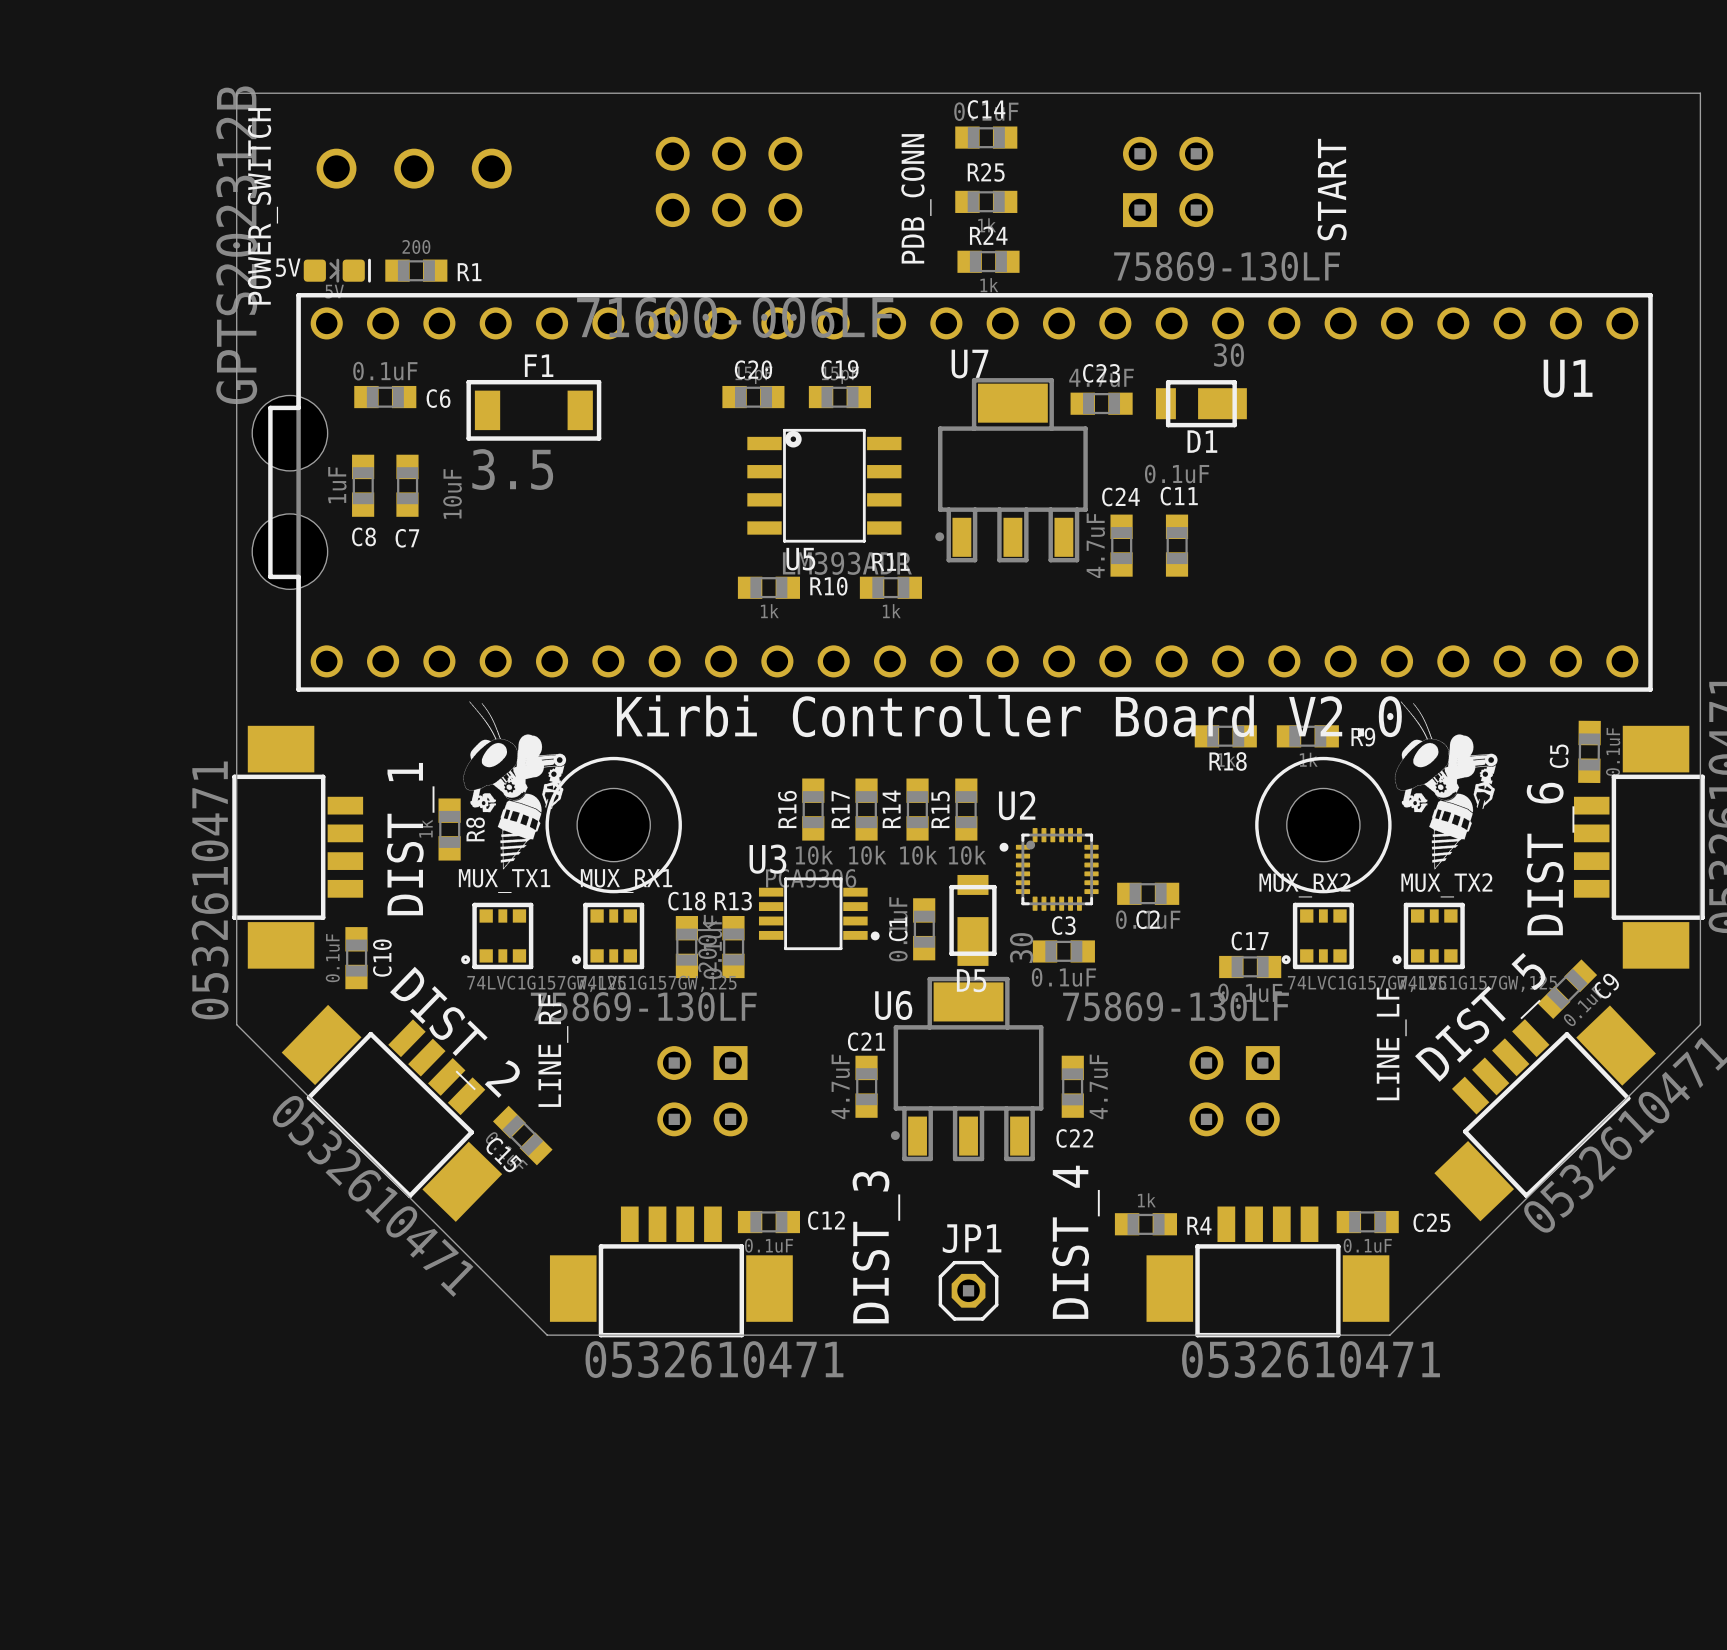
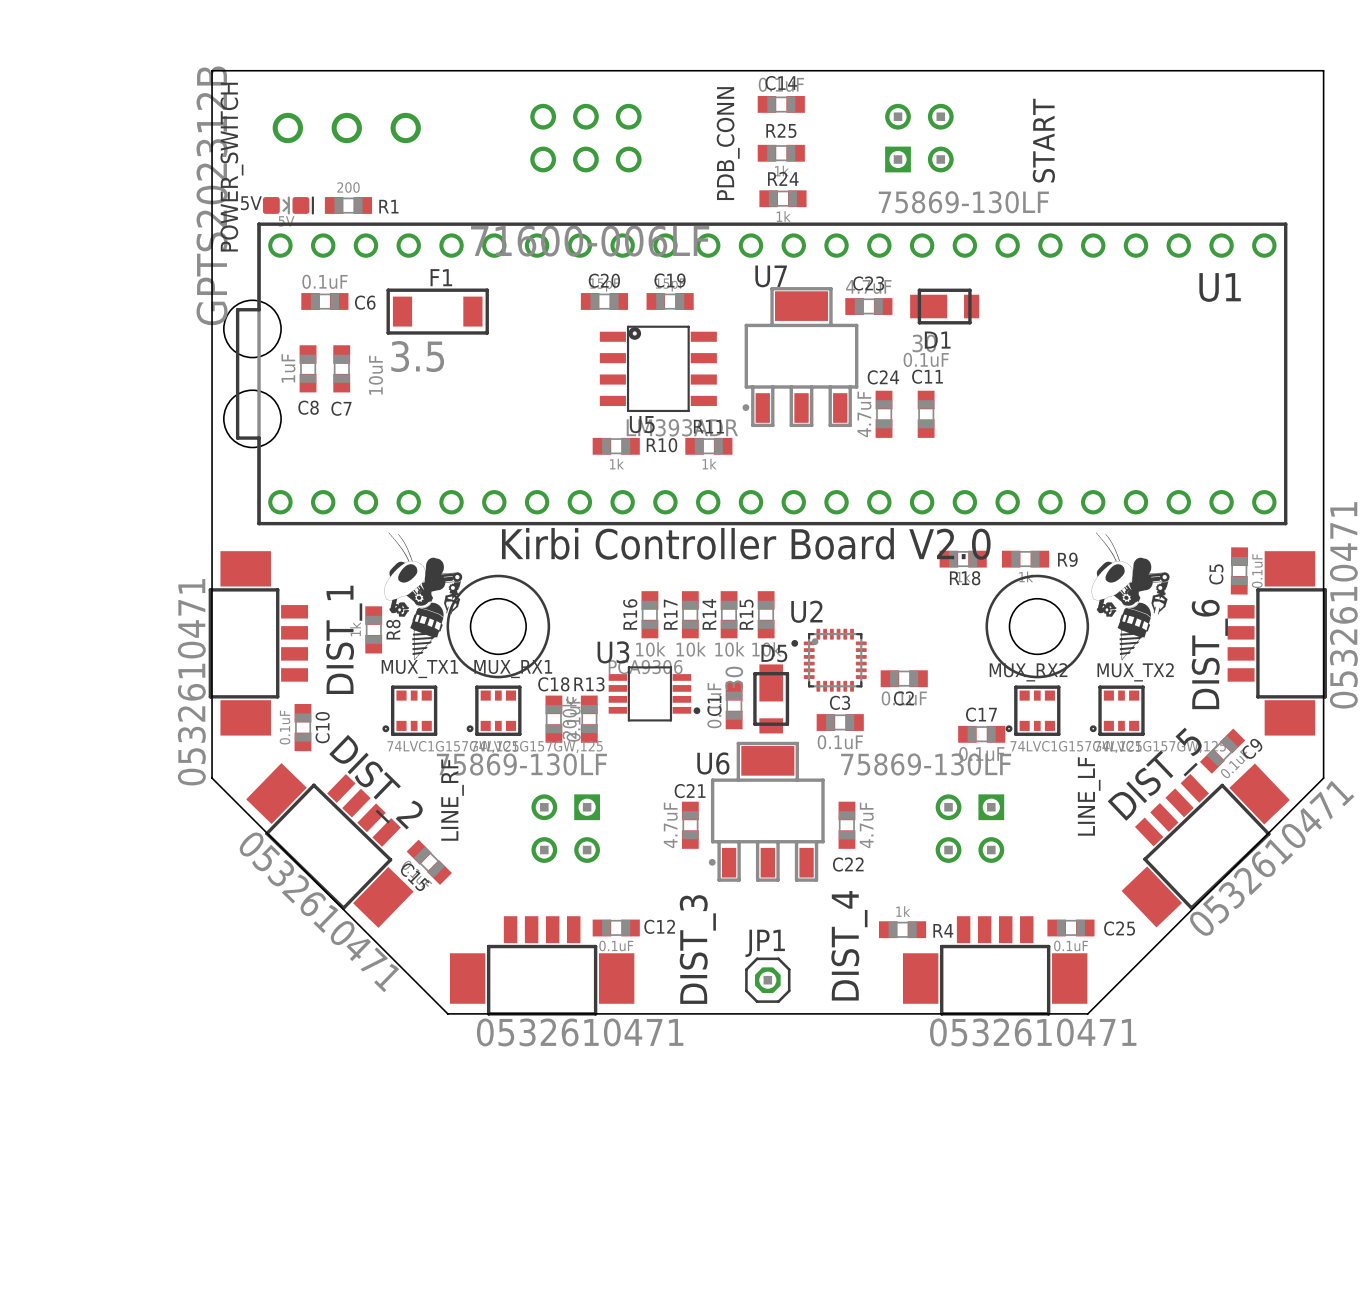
D1 rotation: 0° (1201, 403) -> 180° (944, 306)
D5 rotation: 0° (972, 920) -> 180° (771, 698)

